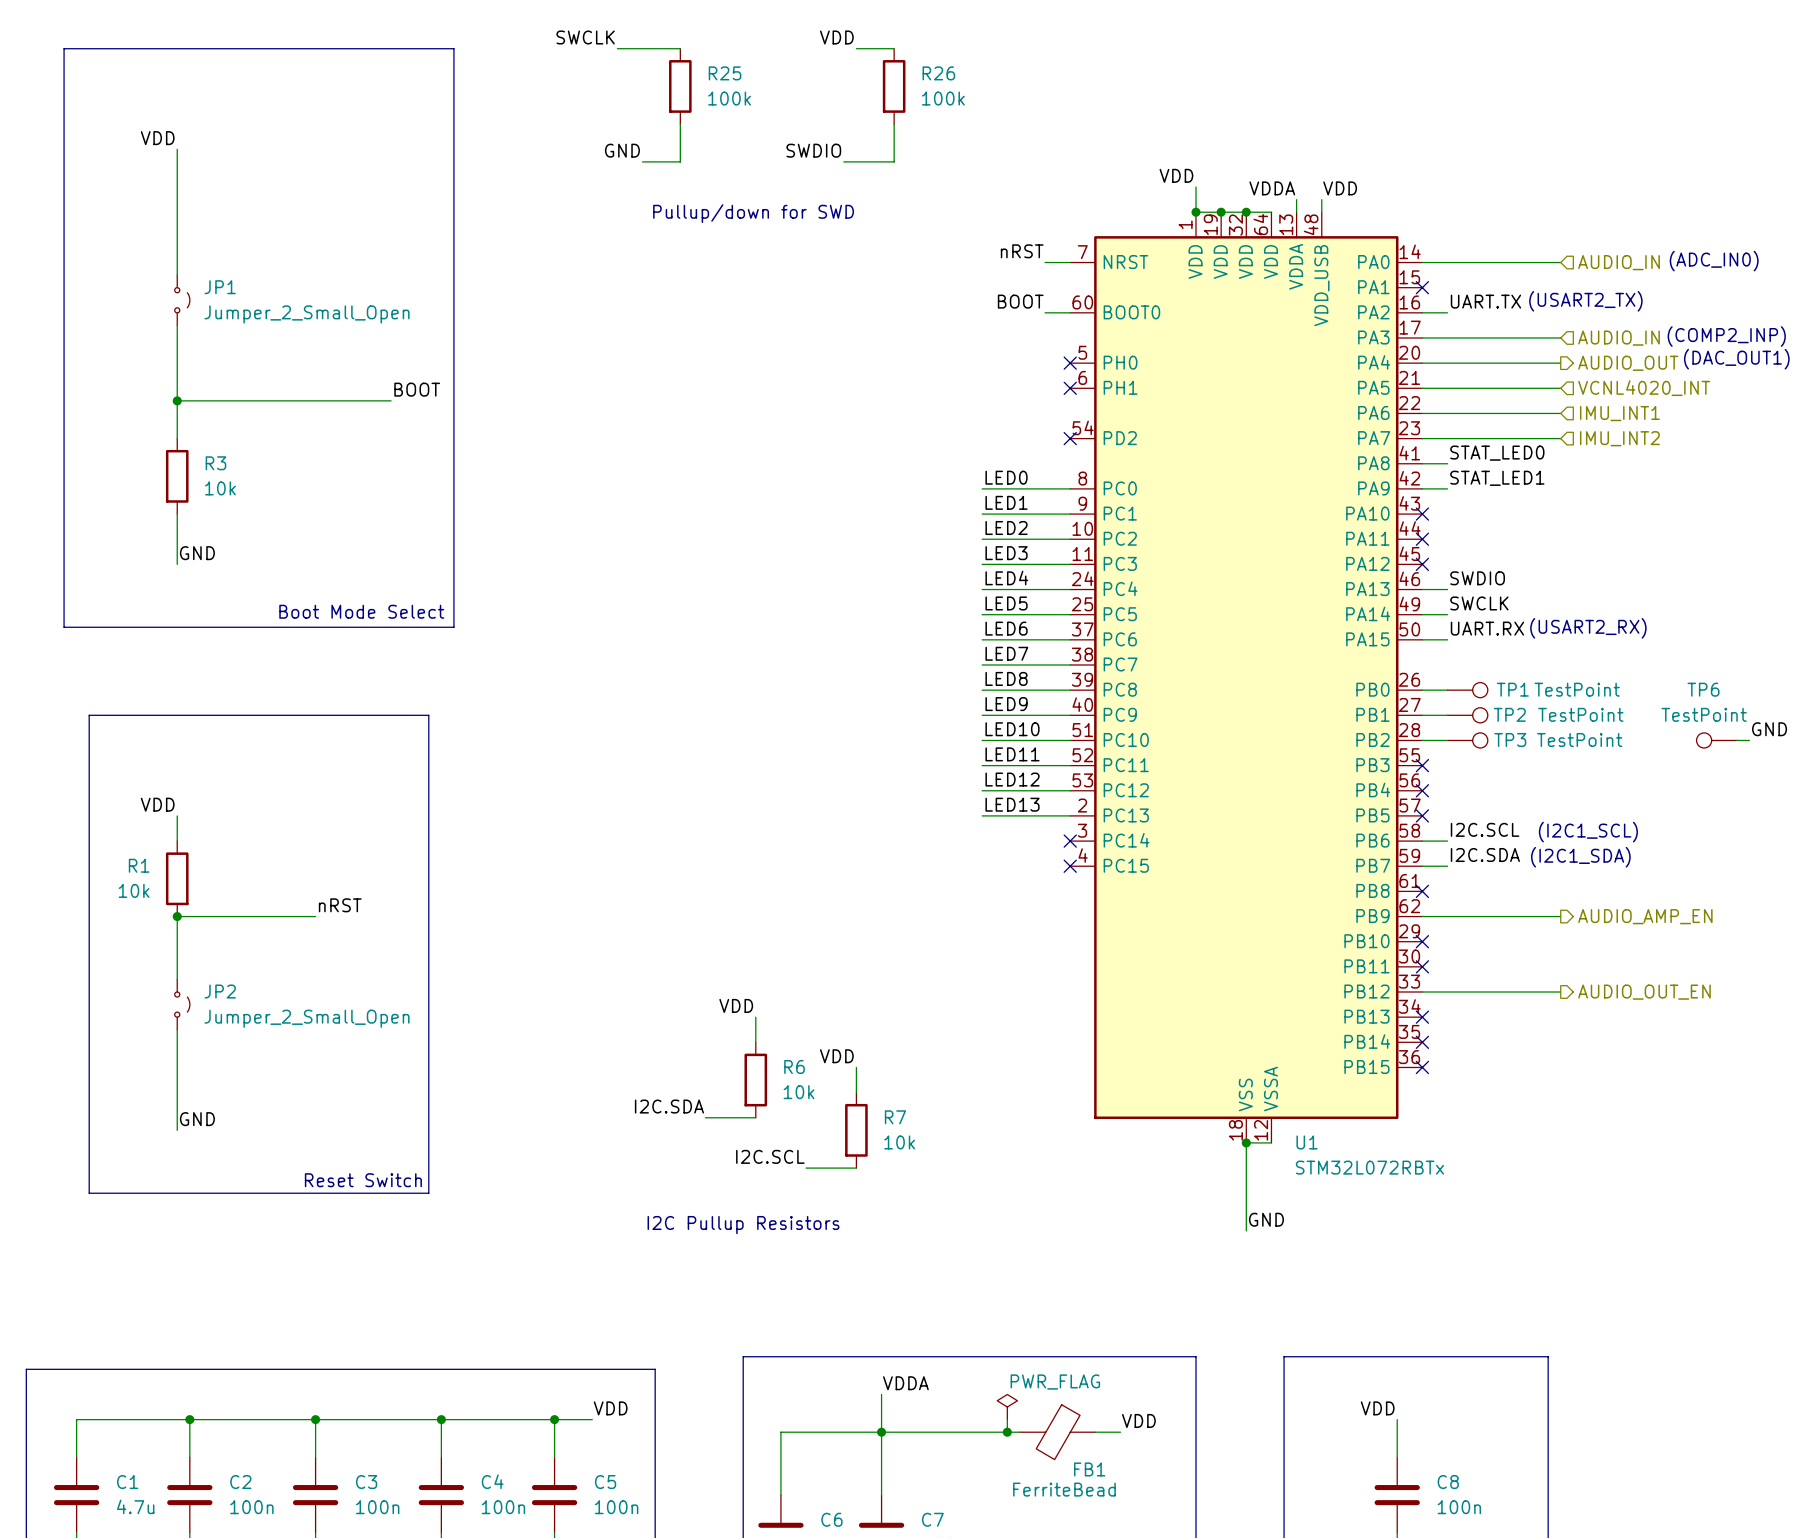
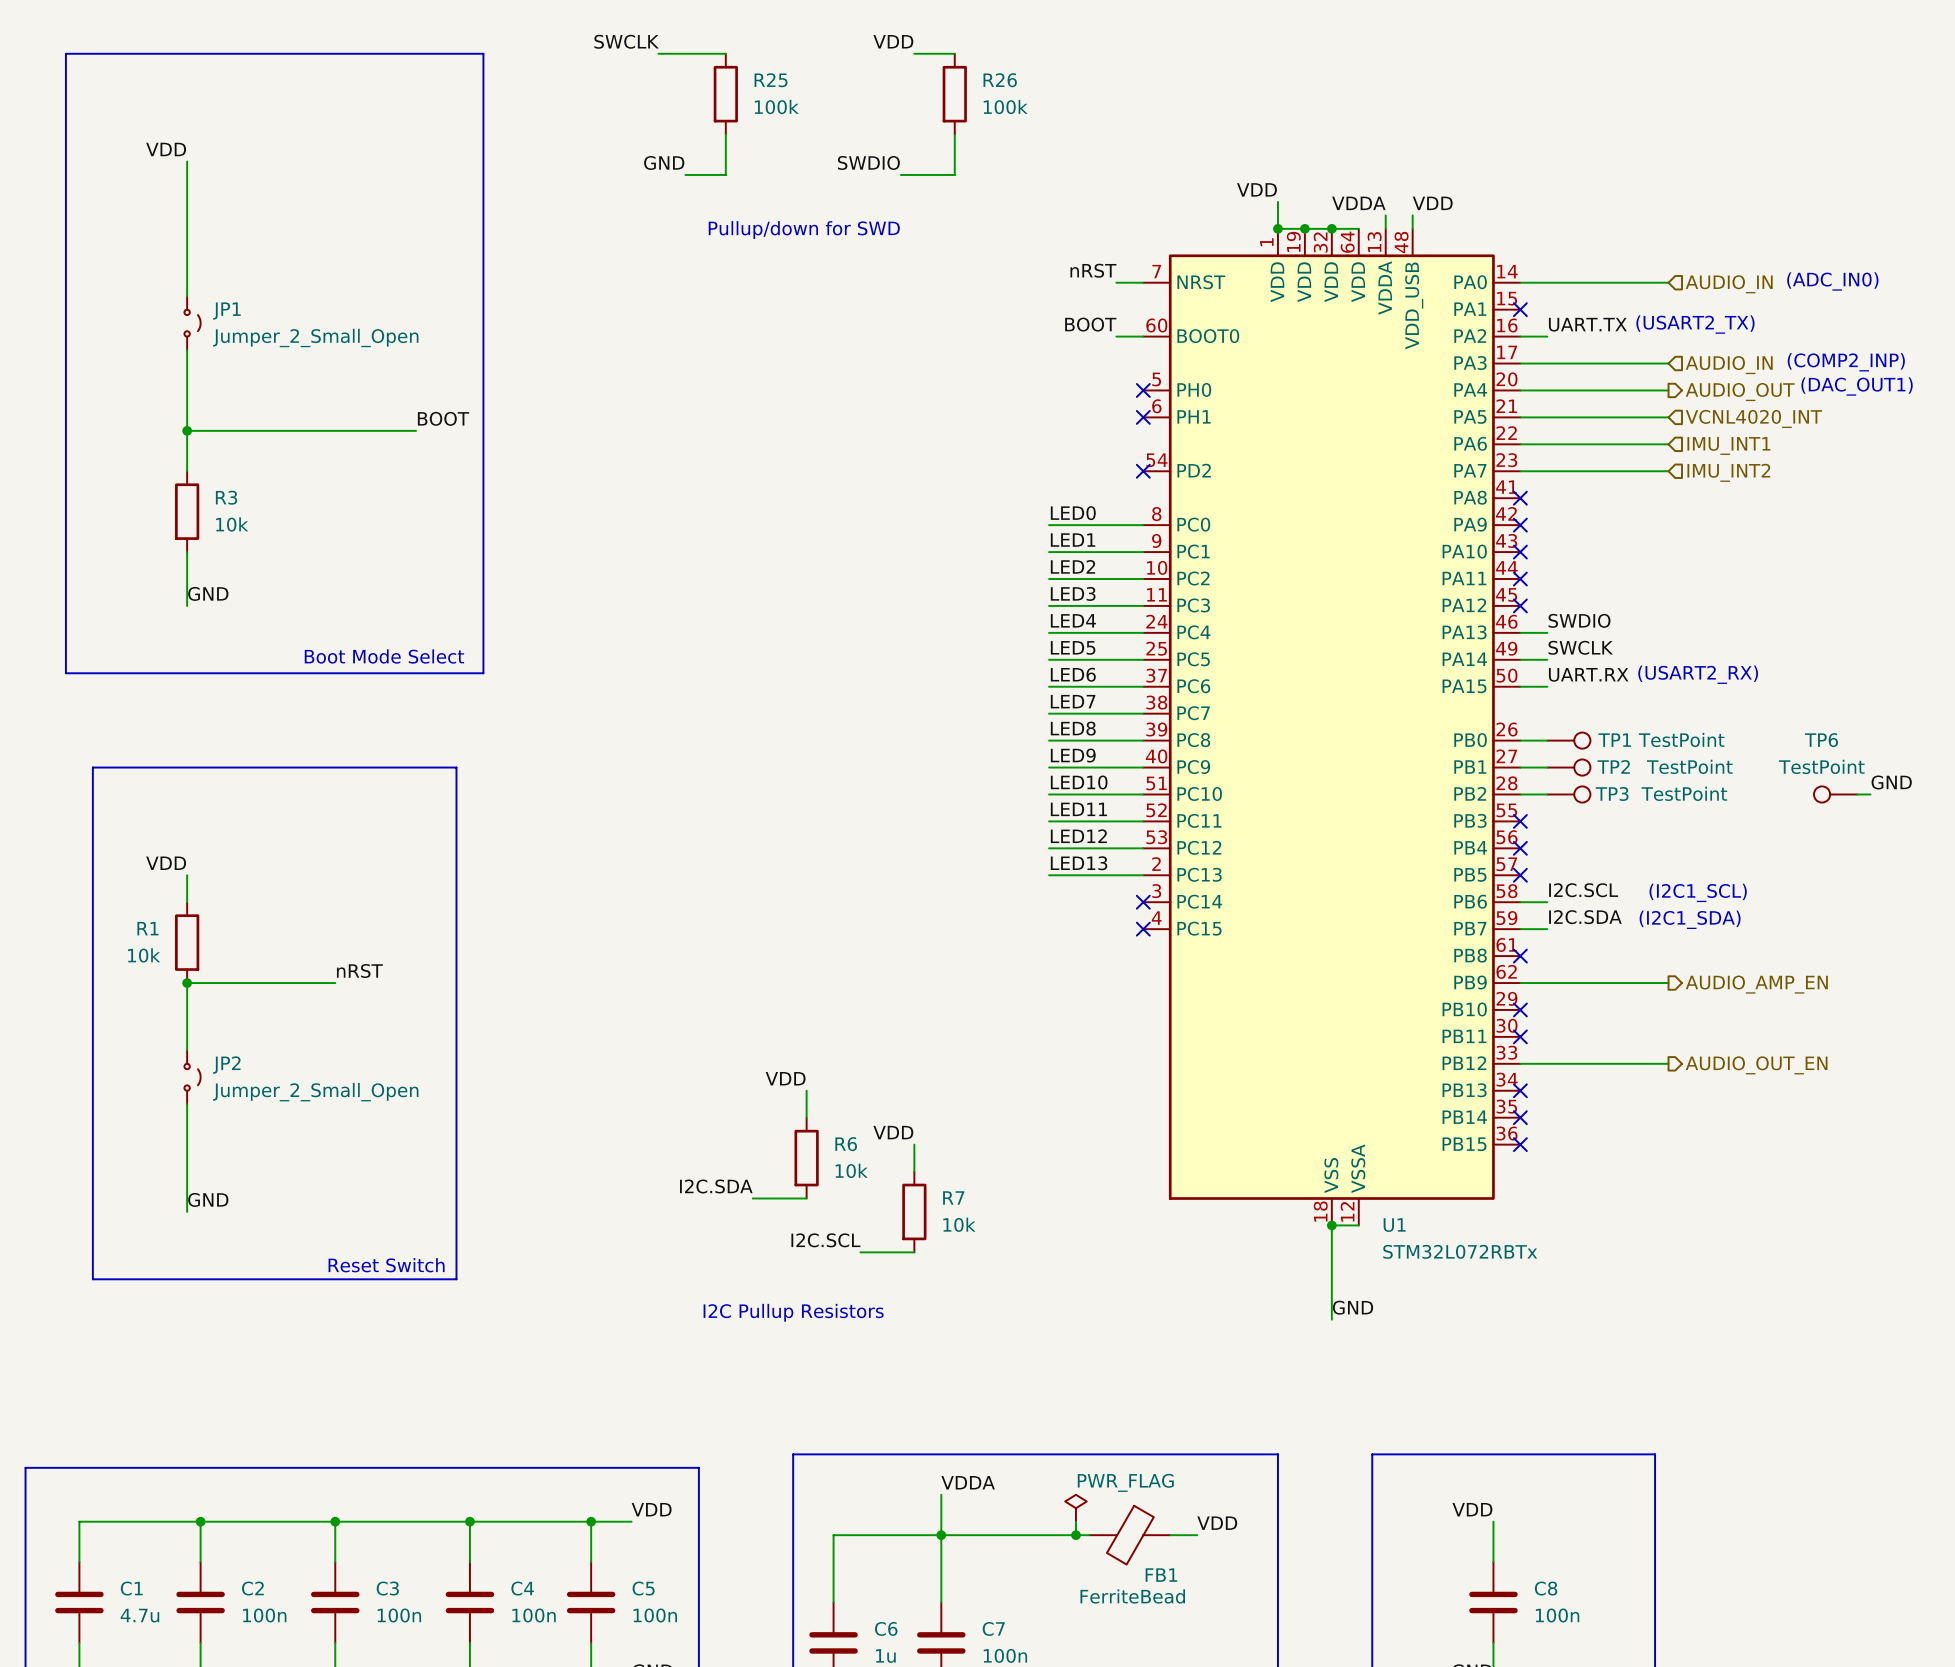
label: STAT_LED0 (1497, 453) -> none
wire: (1422, 463) (1447, 463) -> none
no-connect mark: none -> (1520, 498)
label: STAT_LED1 (1497, 478) -> none
wire: (1422, 488) (1447, 488) -> none
no-connect mark: none -> (1520, 525)

